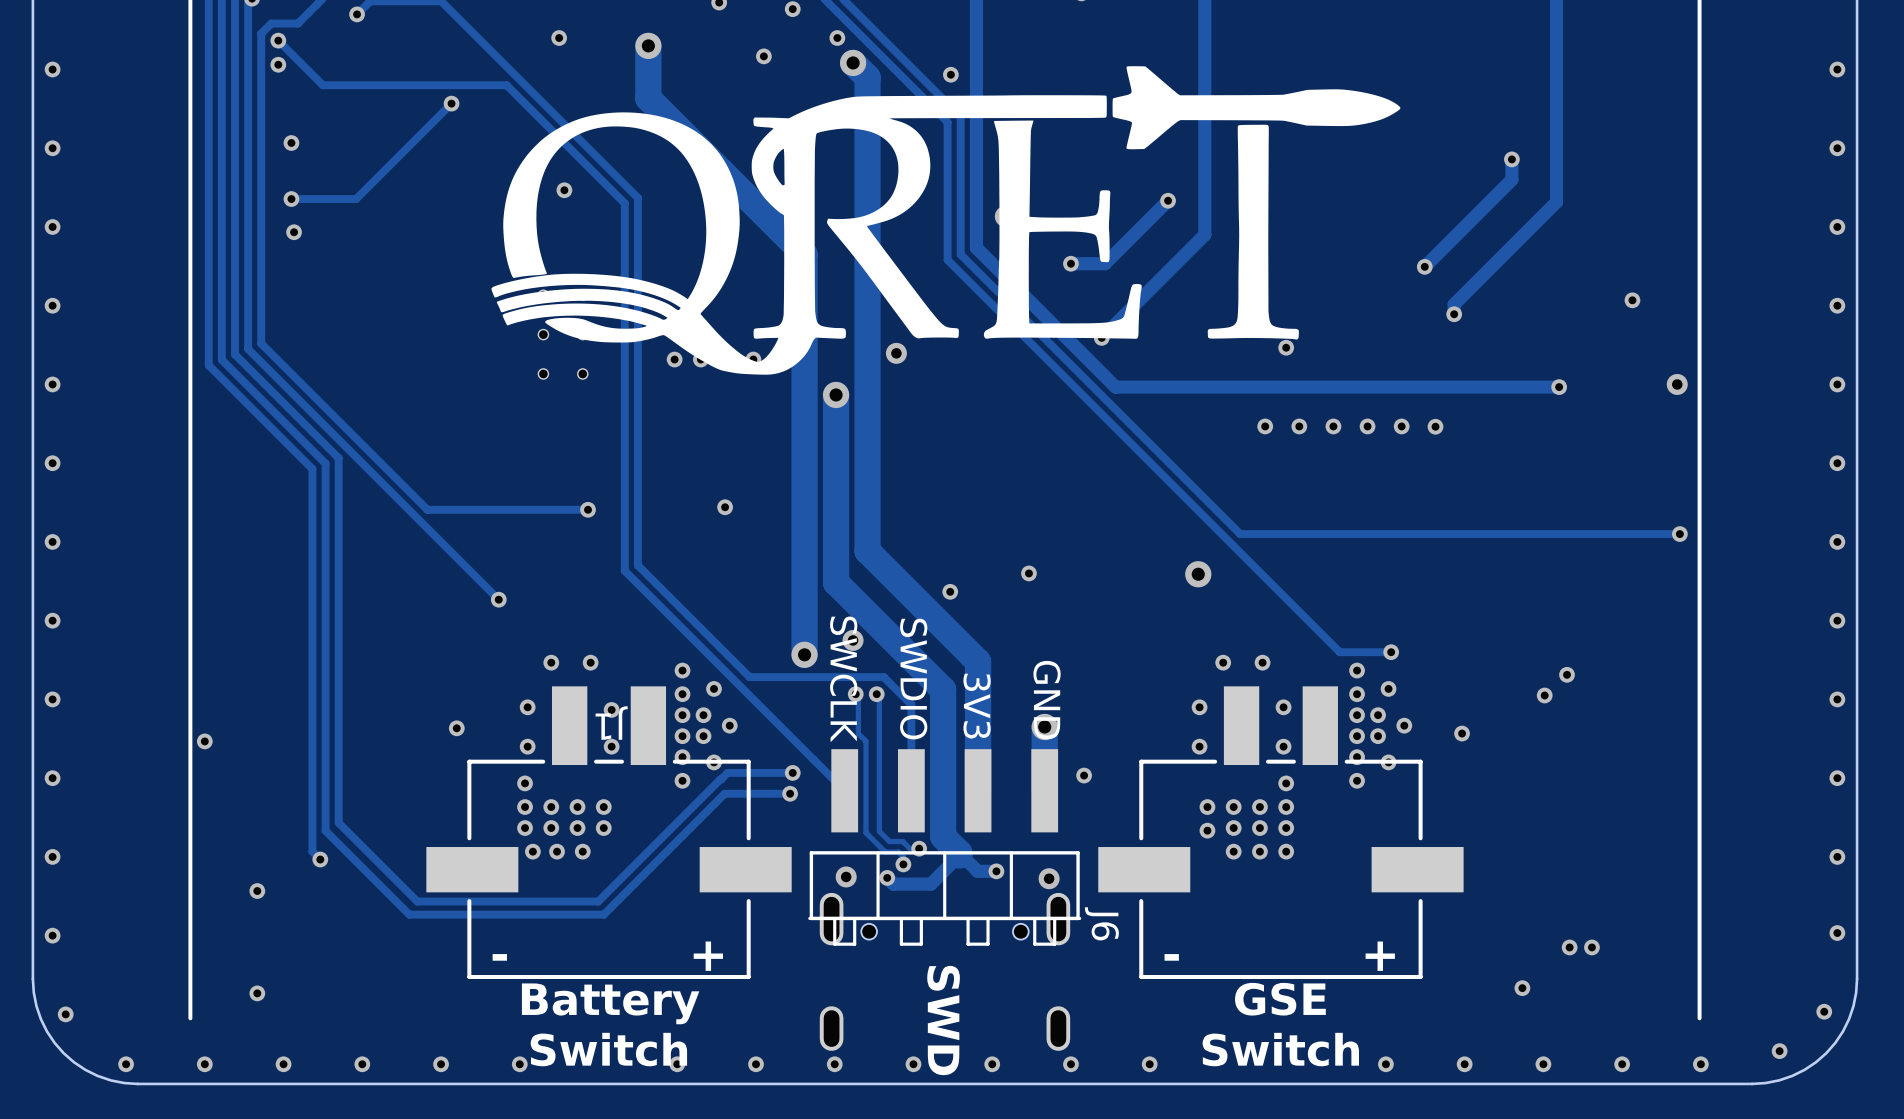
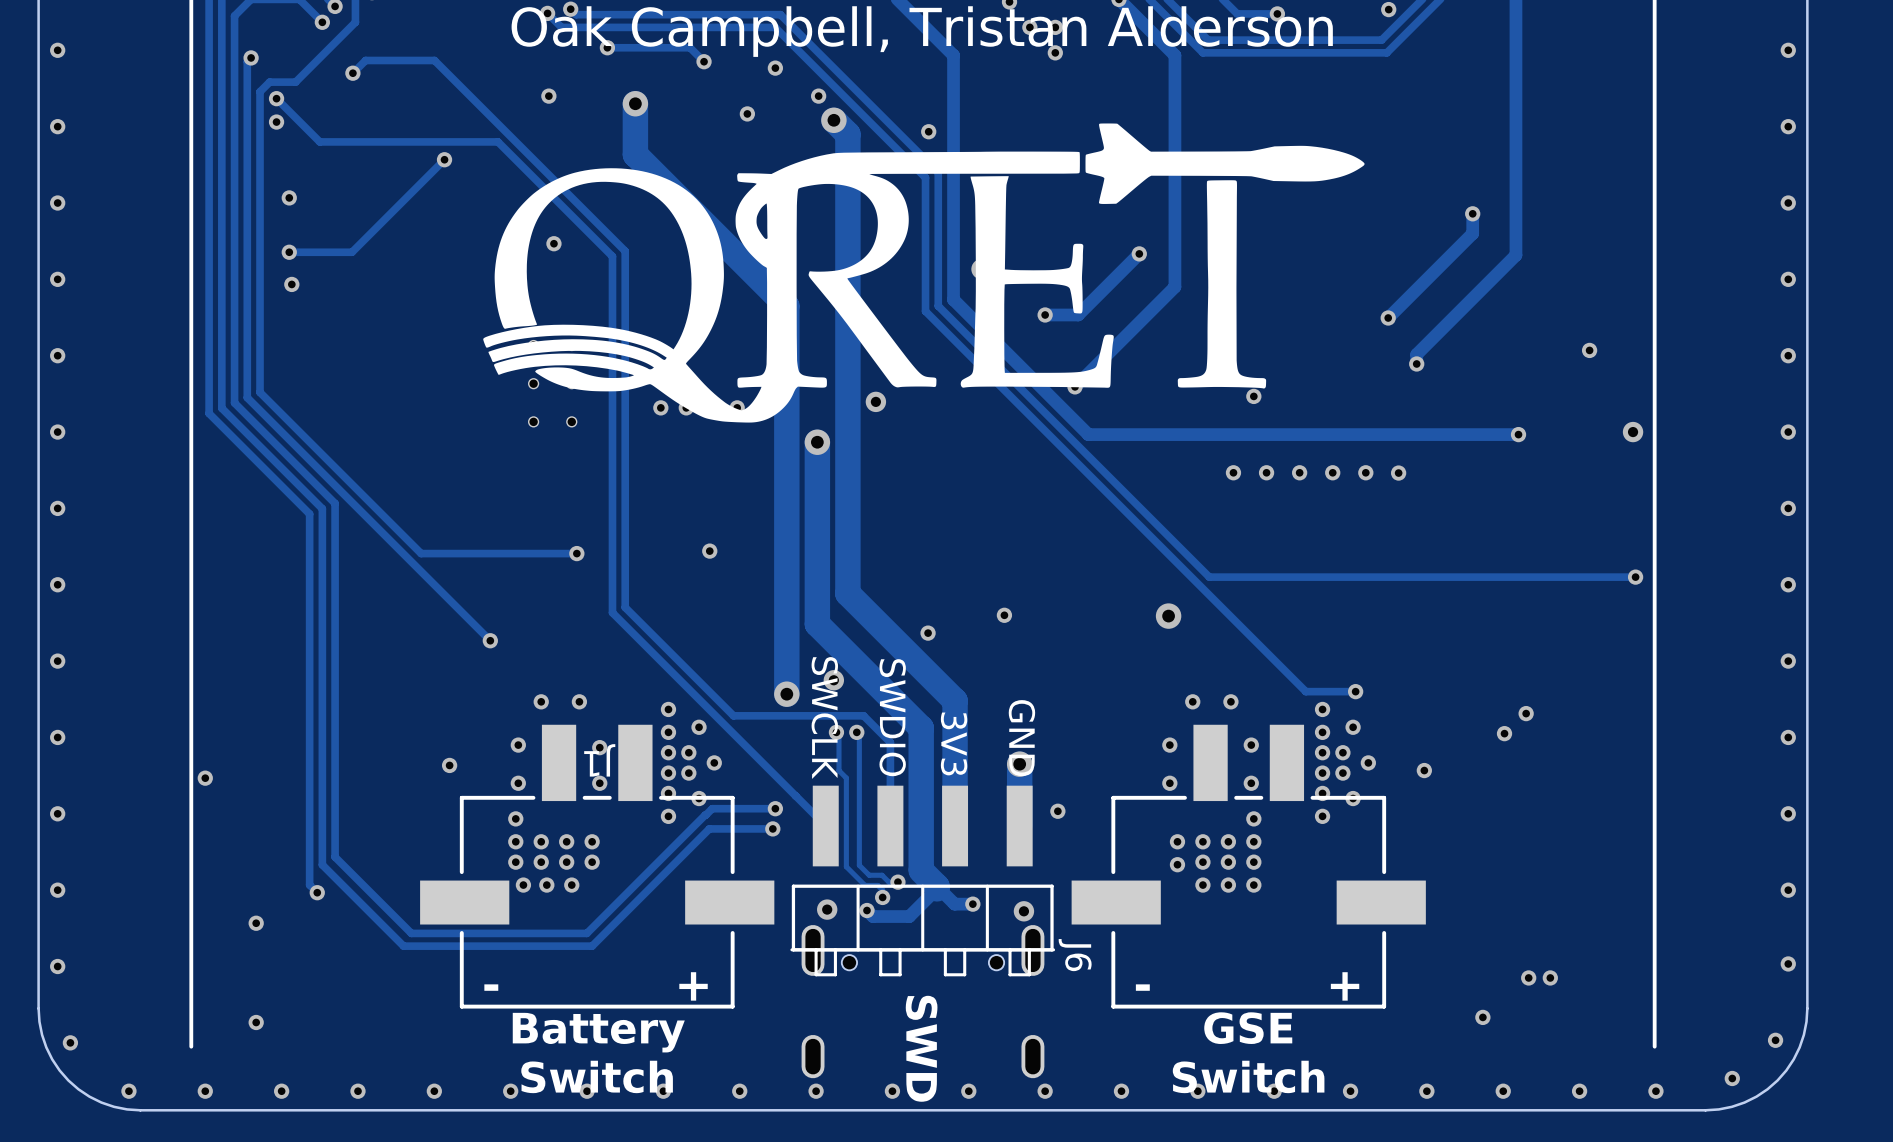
via: none -> (587, 1091)
via: none -> (1197, 1091)
via: none -> (1274, 1091)

